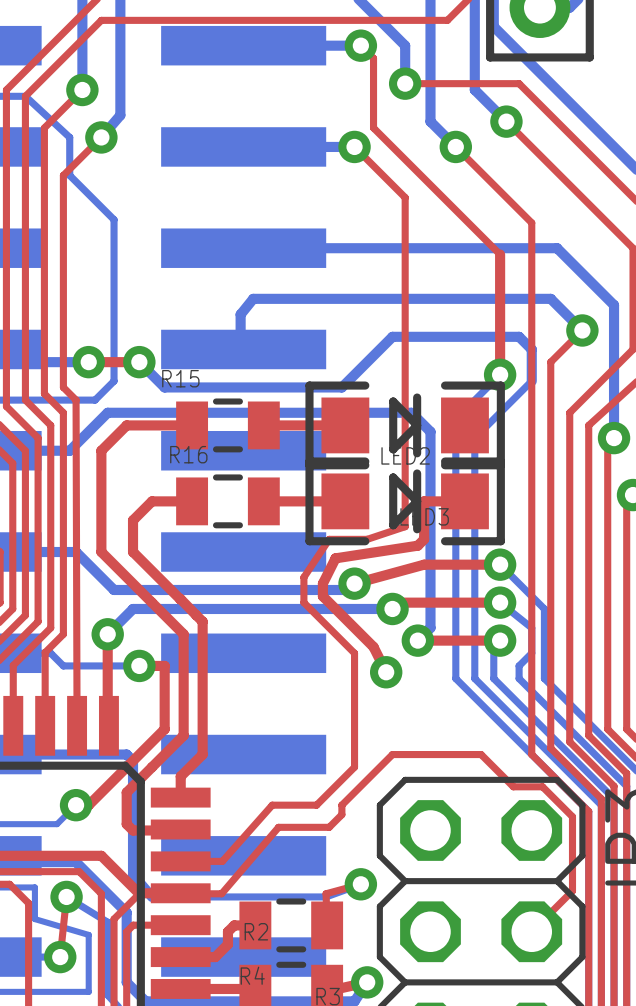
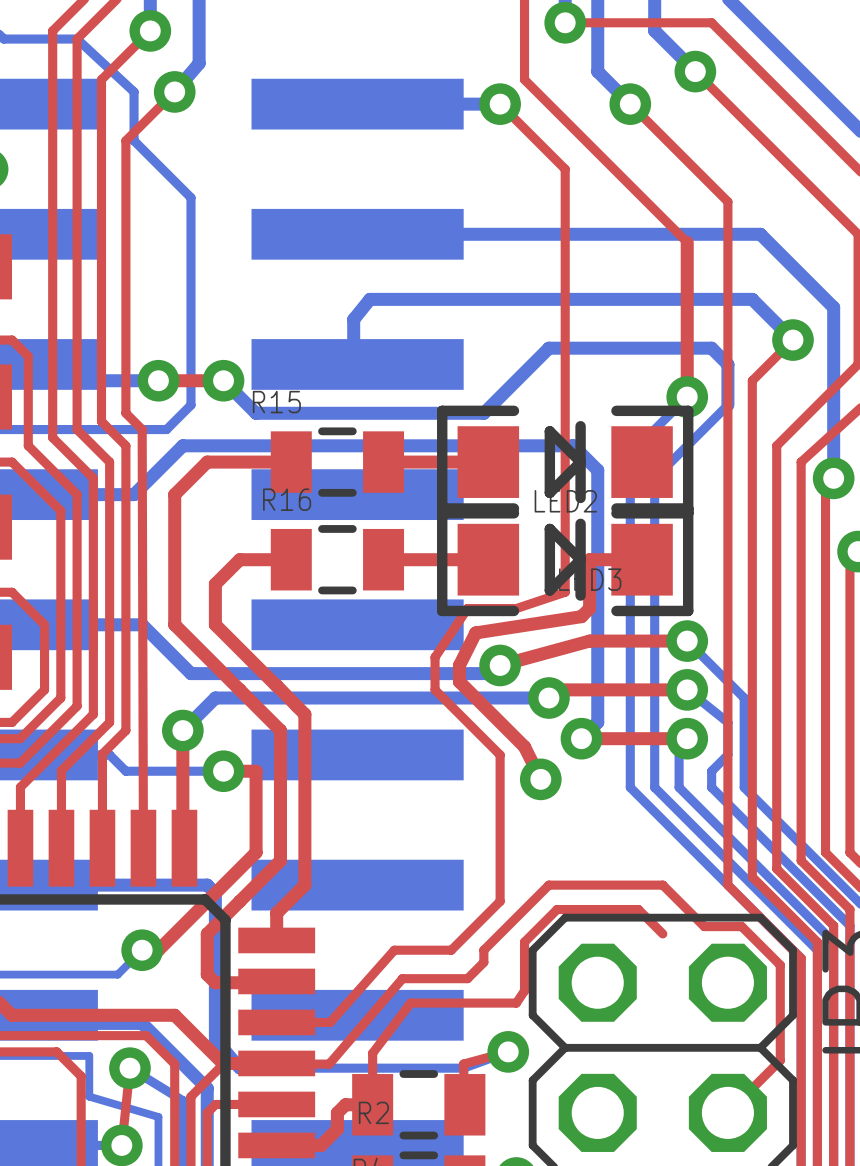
top track: none -> (662, 933) (638, 909) (557, 909) (524, 942) (524, 990) (516, 1003) (410, 1003) (372, 1053) (372, 1104)

